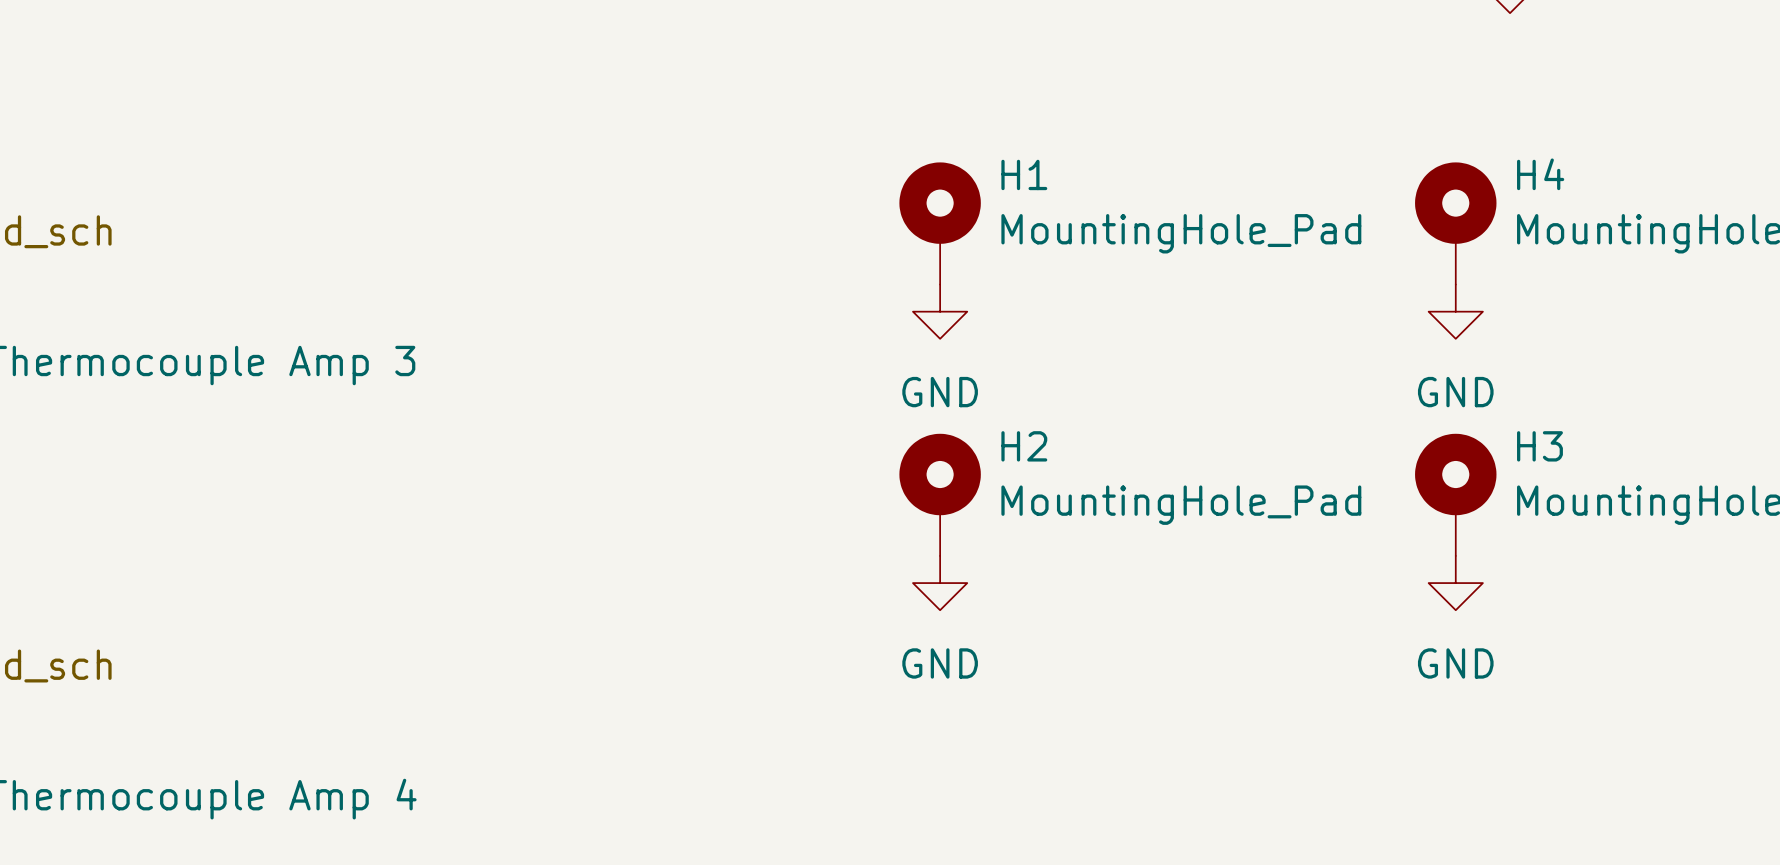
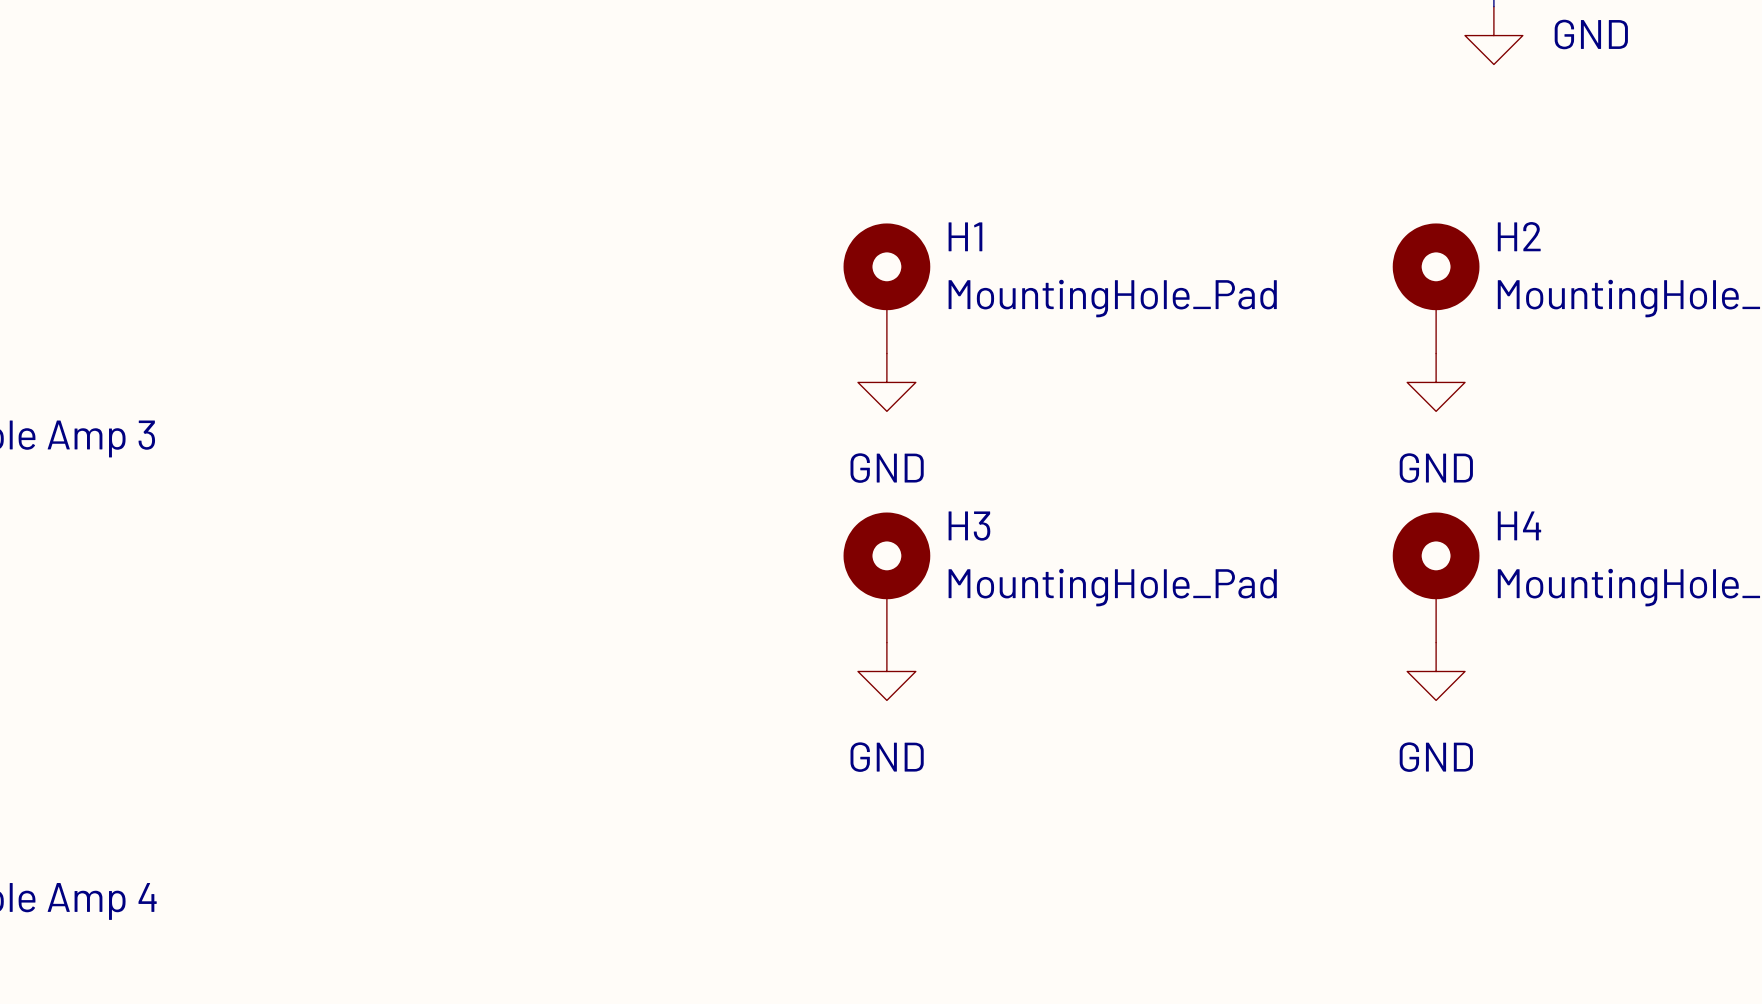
H4 name: H4 (1540, 174) -> H2 (1519, 236)
H2 name: H2 (1024, 446) -> H3 (969, 526)
H3 name: H3 (1539, 446) -> H4 (1519, 525)

